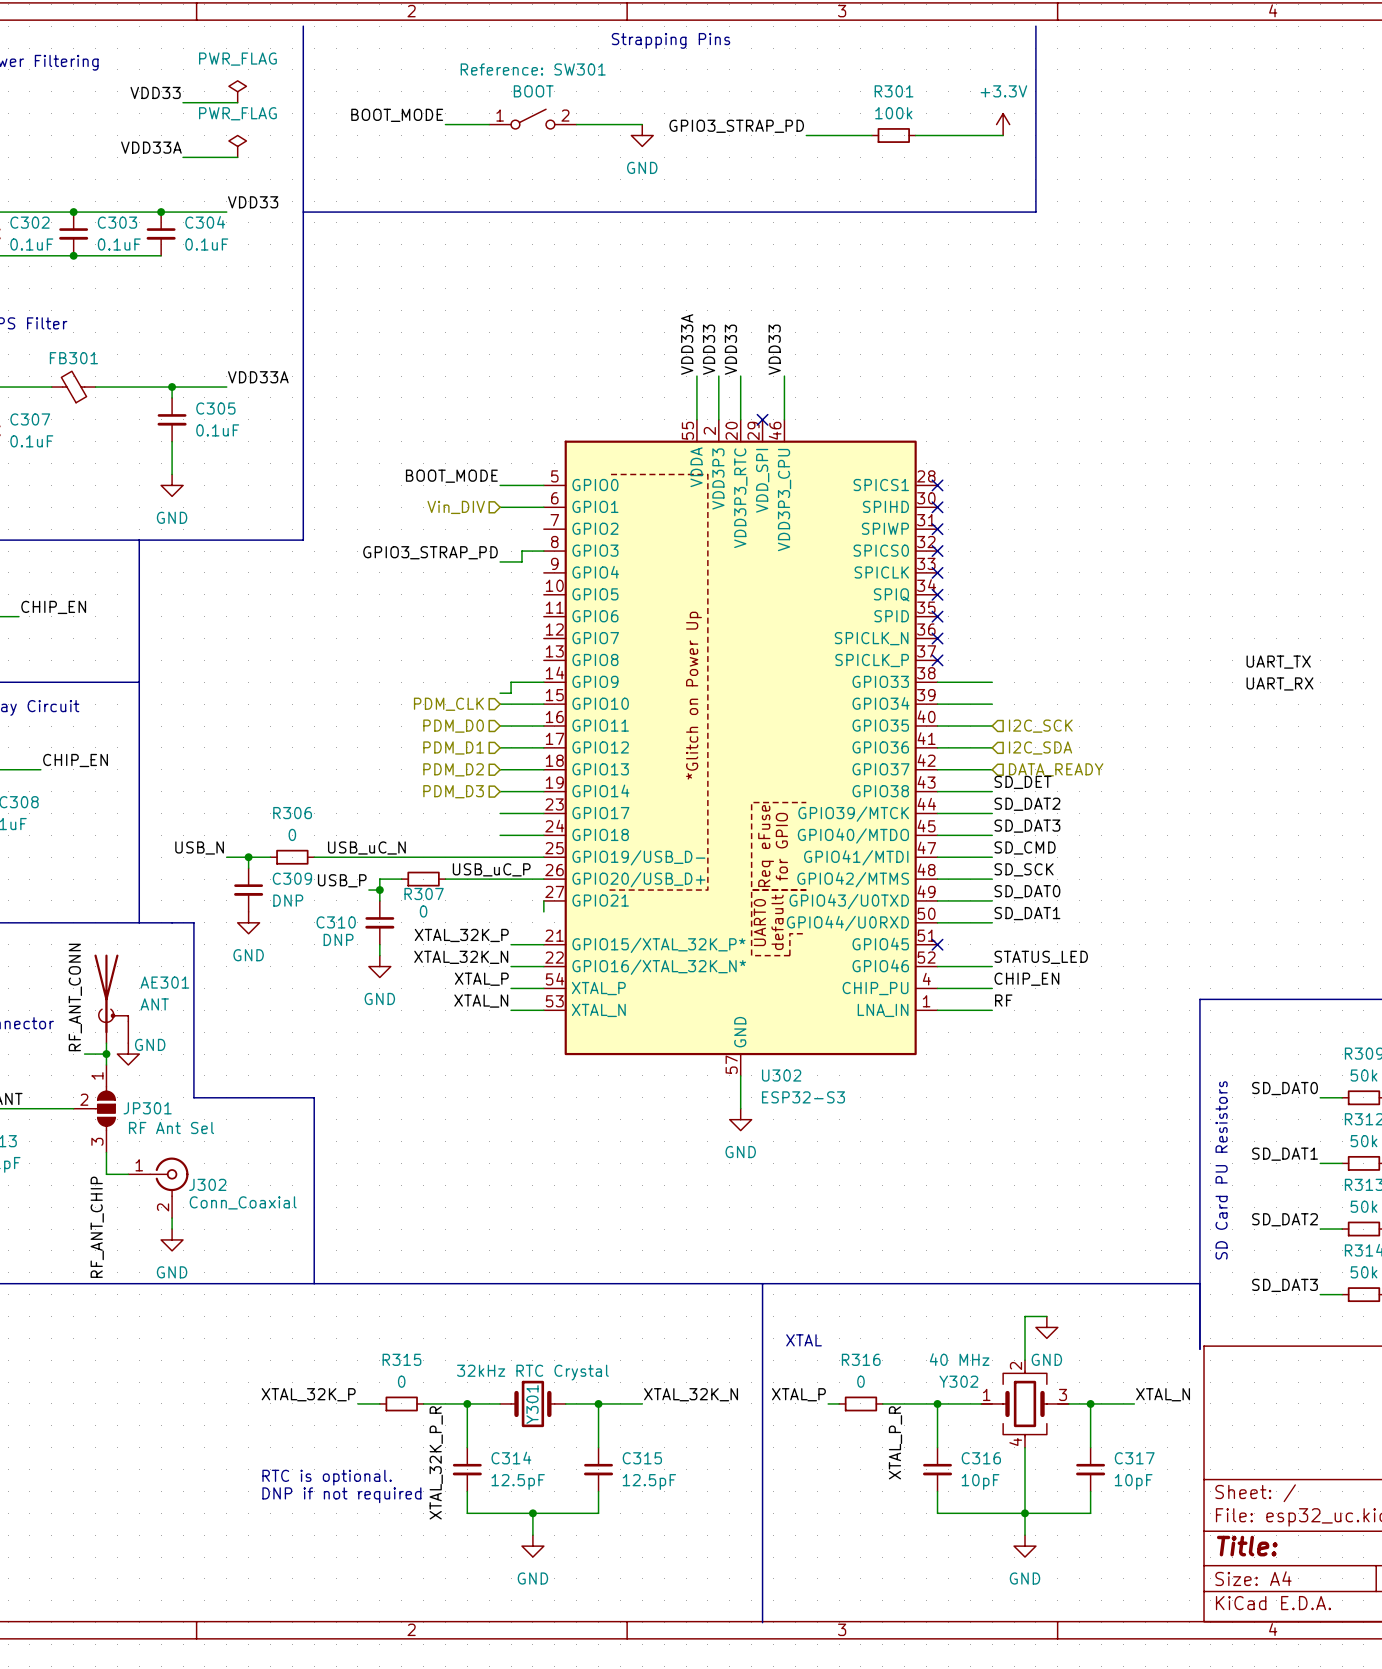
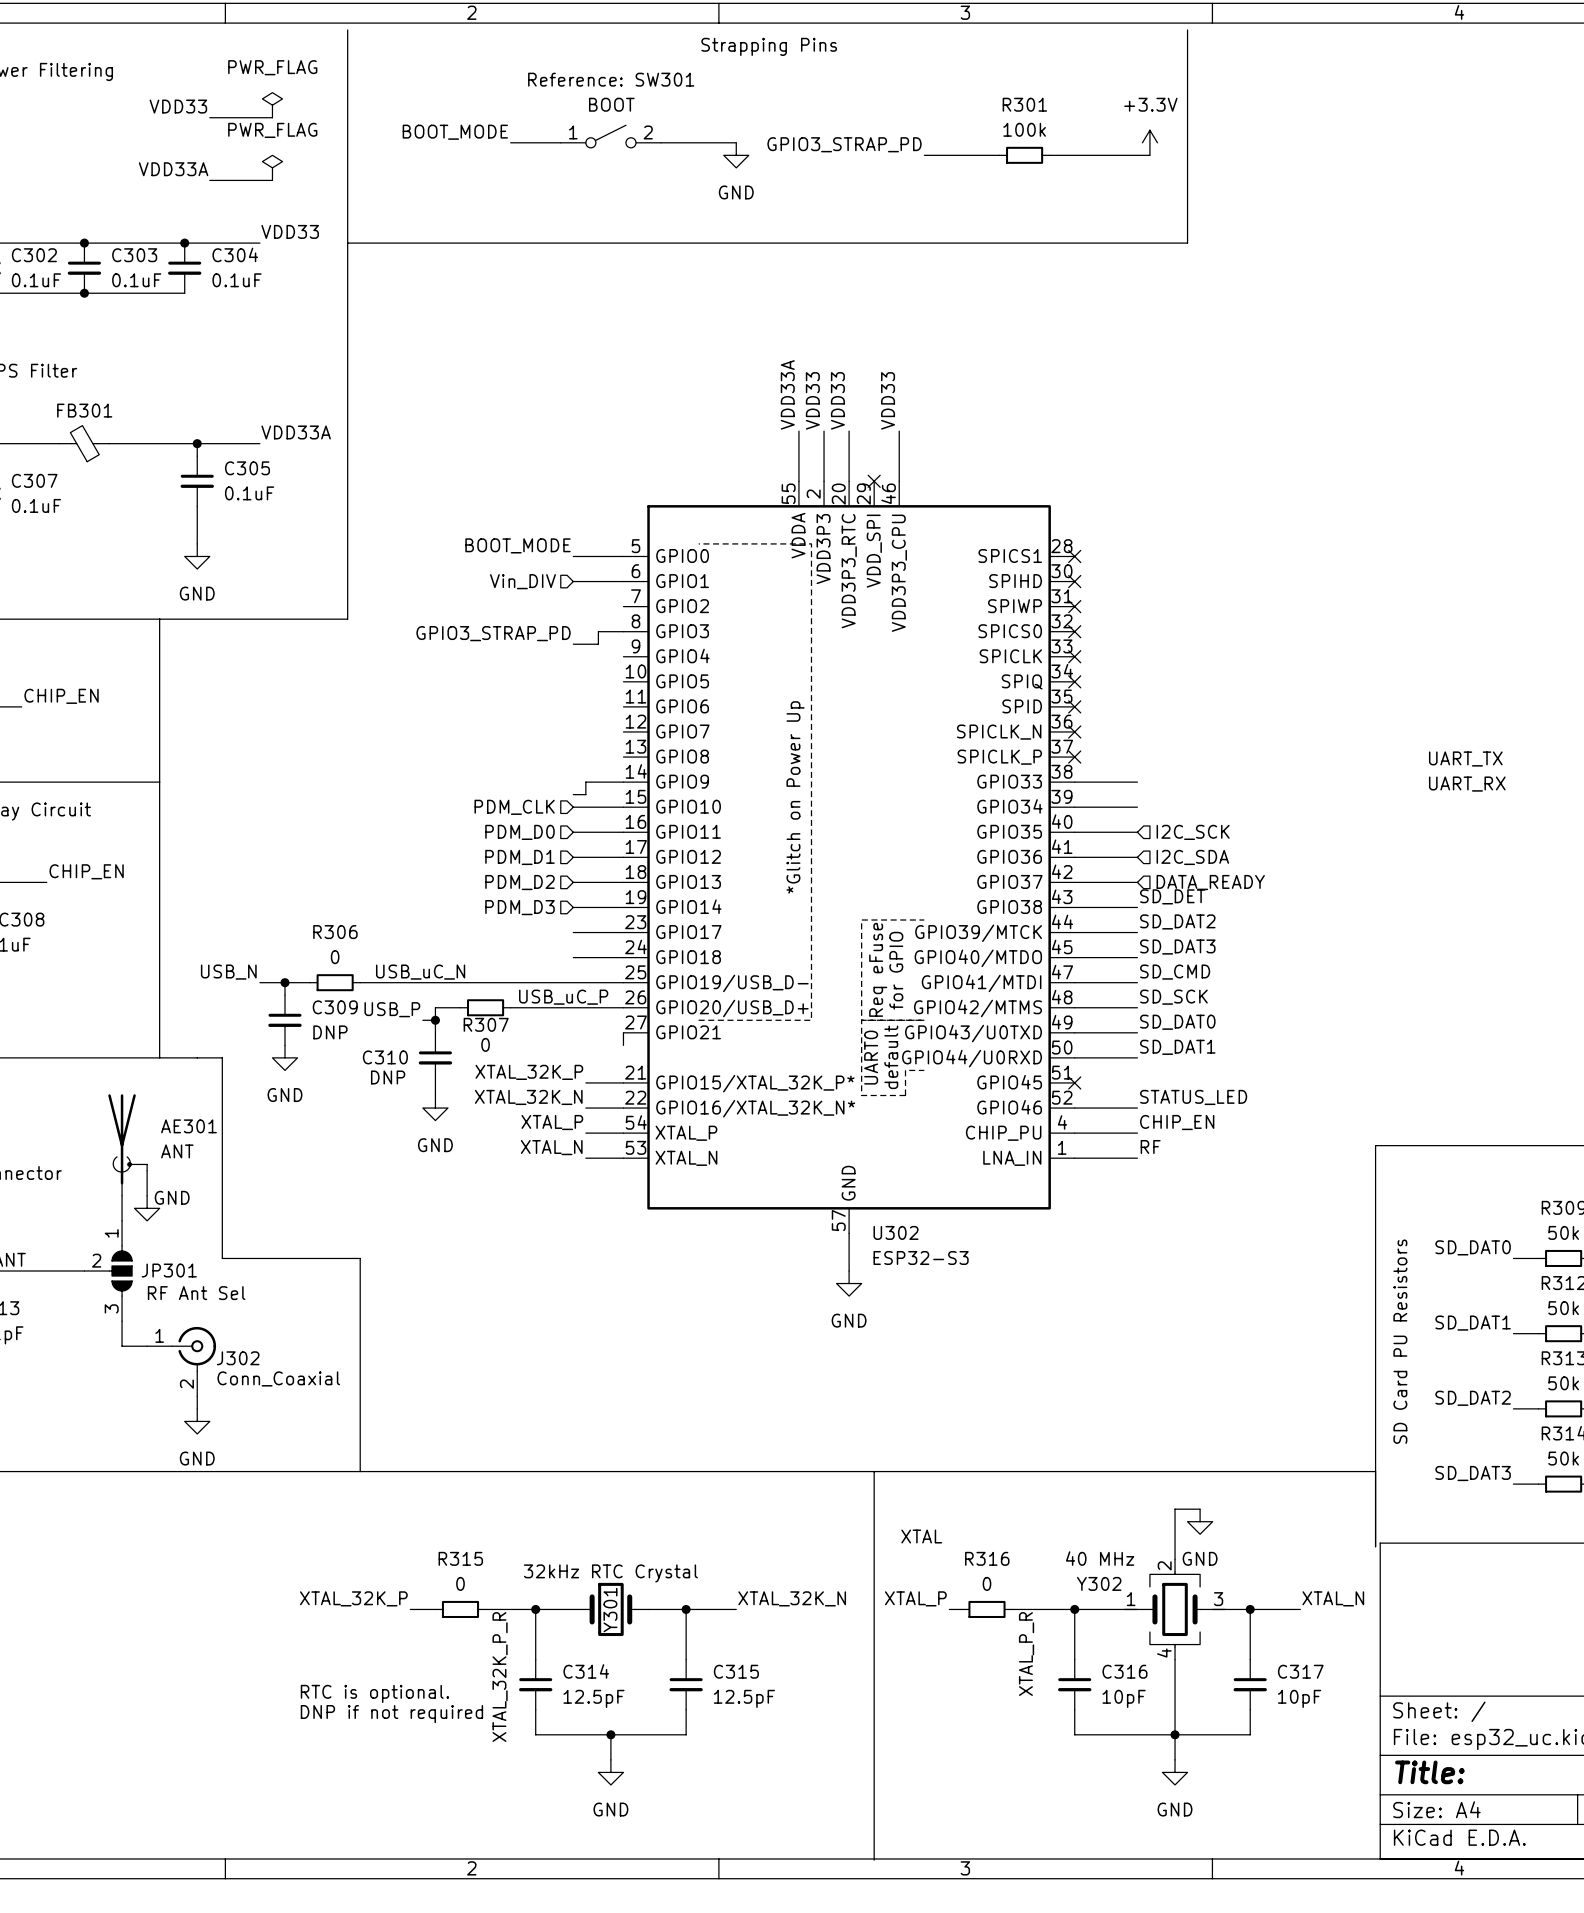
label: RF_ANT_CONN (75, 997) -> none
wire: (84, 1054) (106, 1054) -> none
junction: (106, 1054) -> none
label: RF_ANT_CHIP (97, 1227) -> none

